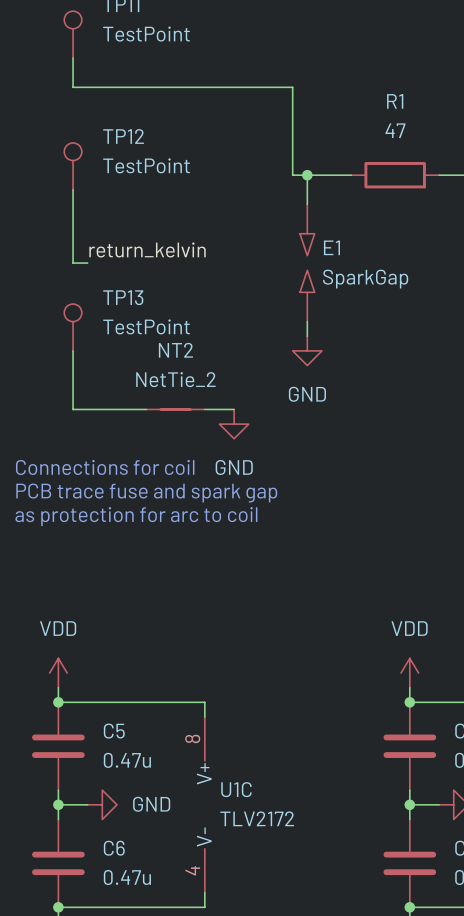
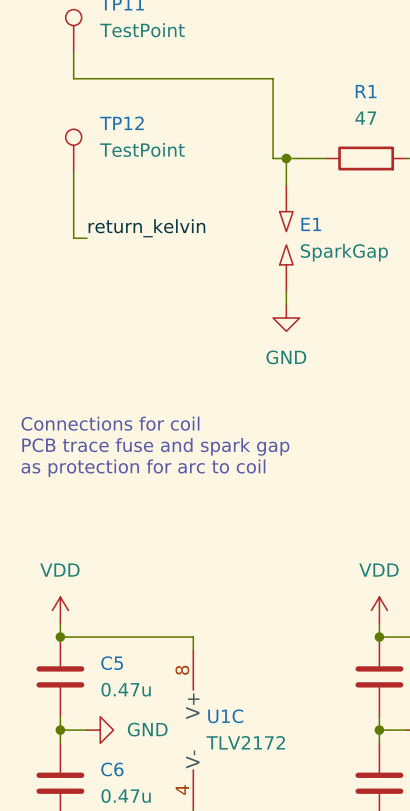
TP13: TestPoint (73, 327) -> none
wire: (73, 350) (73, 409) (146, 409) -> none
NT2: NetTie_2 (175, 409) -> none
wire: (204, 409) (234, 409) -> none
power symbol: GND (234, 424) -> none

